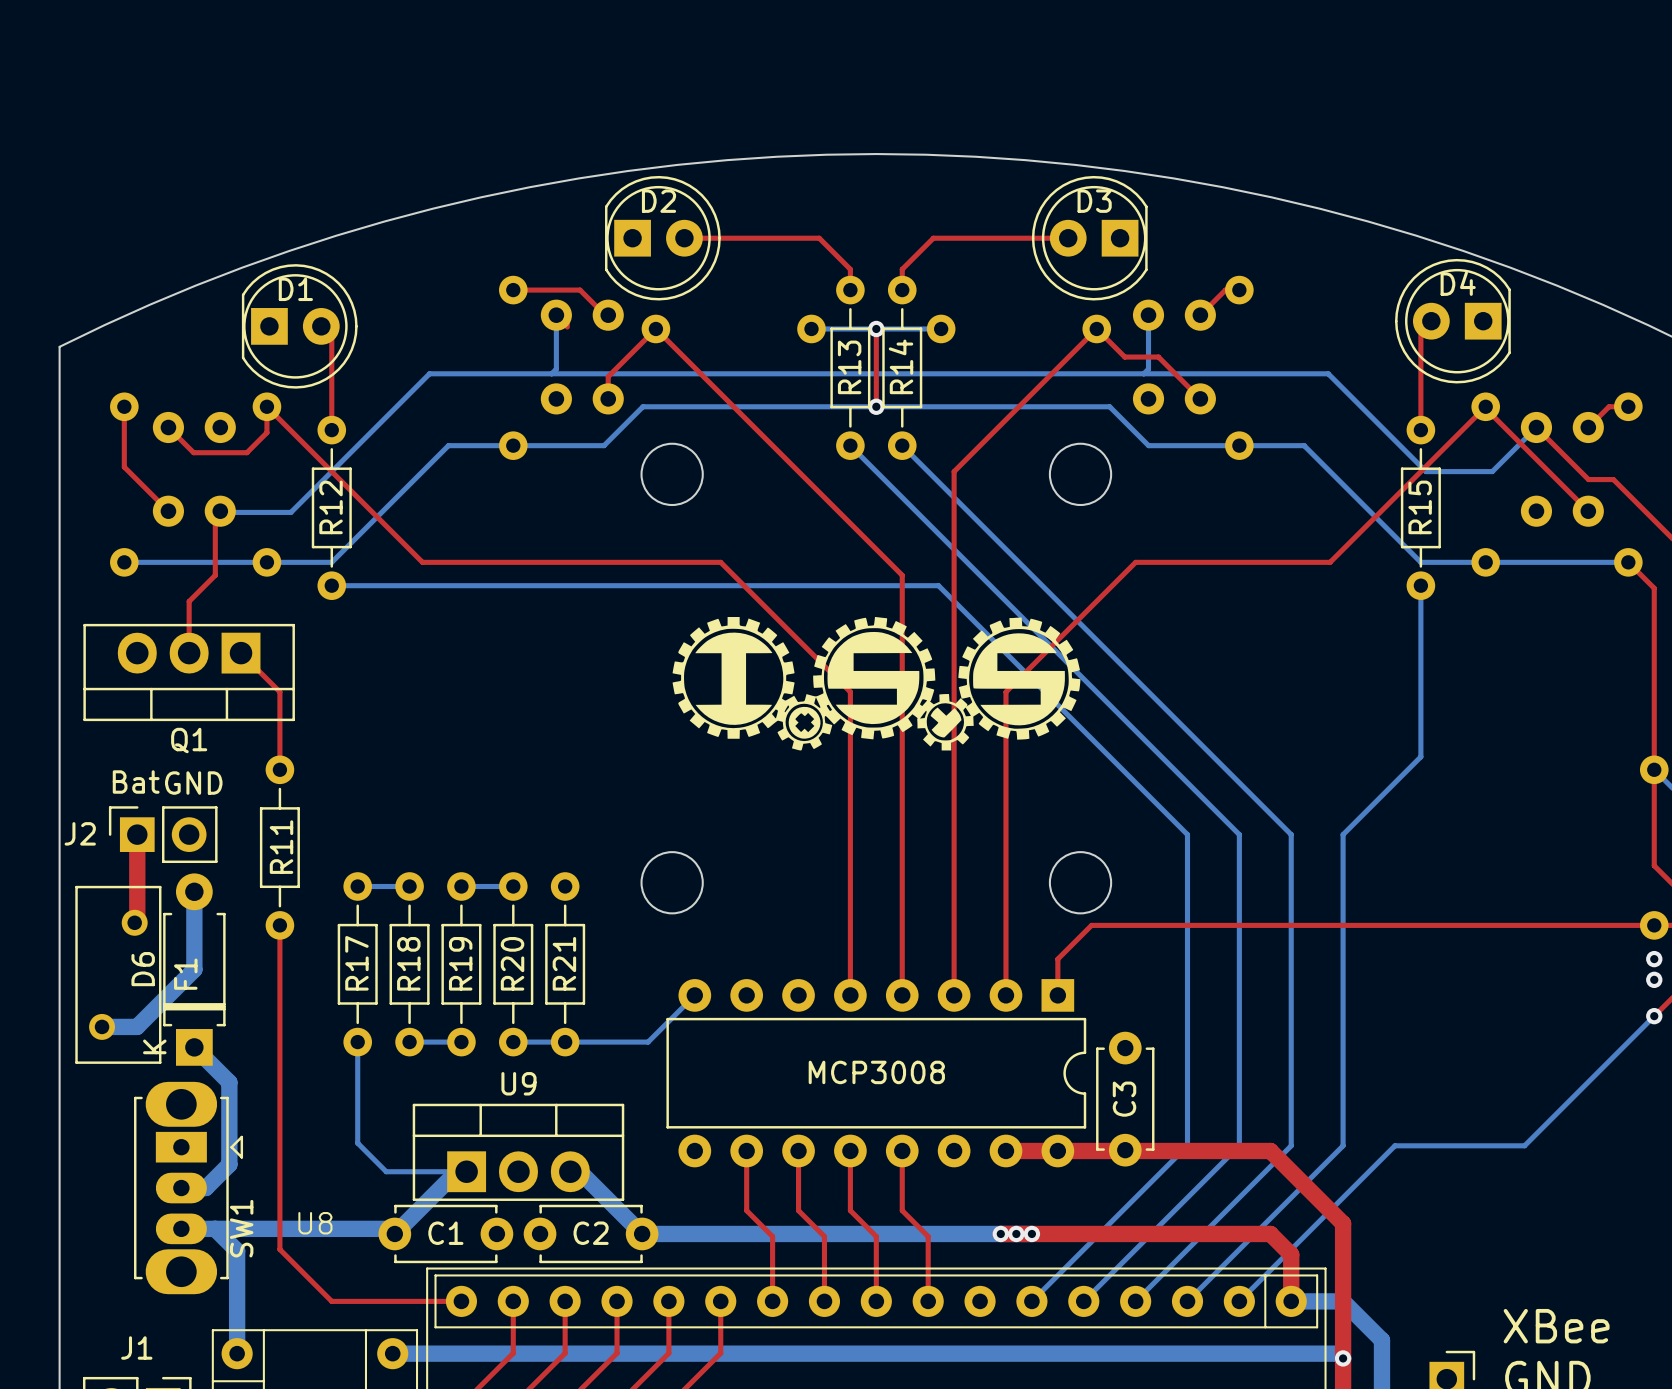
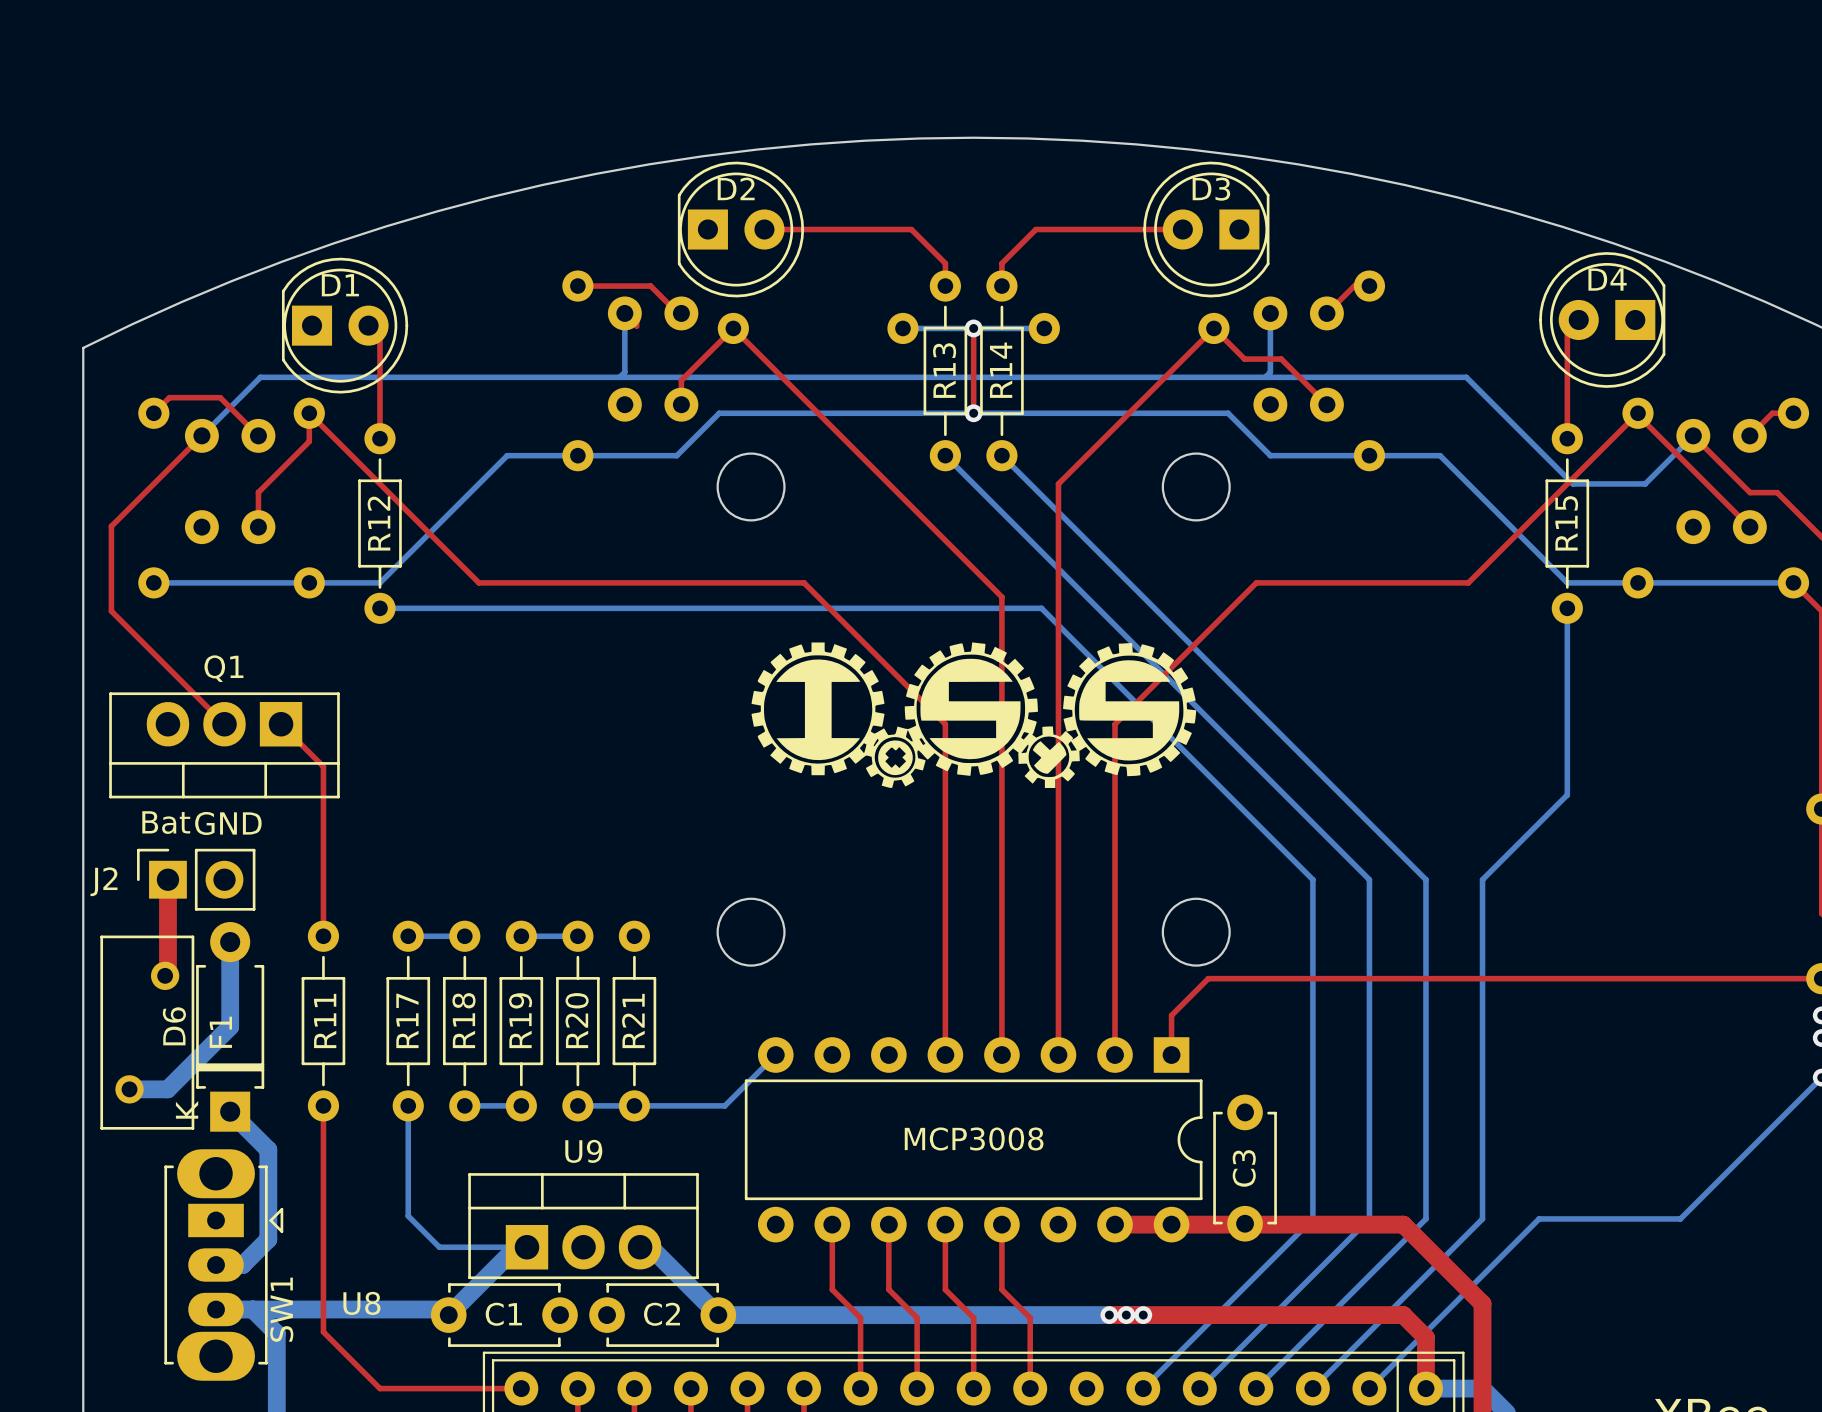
bottom track: (429, 373) (290, 512) (215, 512) -> (486, 377) (260, 377) (201, 435)
top track: (124, 406) (124, 467) (168, 511) -> (153, 413) (169, 397) (220, 397) (258, 435)
top track: (168, 427) (193, 452) (246, 452) -> (258, 527) (258, 492) (287, 463)
top track: none -> (201, 435) (111, 526) (111, 611) (224, 724)
top track: (215, 516) (215, 575) (189, 601) (189, 653) -> none
top track: (241, 653) (279, 692) (279, 730) -> (281, 724) (323, 766)
Q1 position: (189, 672) -> (224, 745)
Q1 name position: Q1 (189, 740) -> Q1 (223, 668)
R11 position: (279, 847) -> (323, 1021)
top track: (279, 925) (279, 1042) -> (323, 809) (323, 936)

